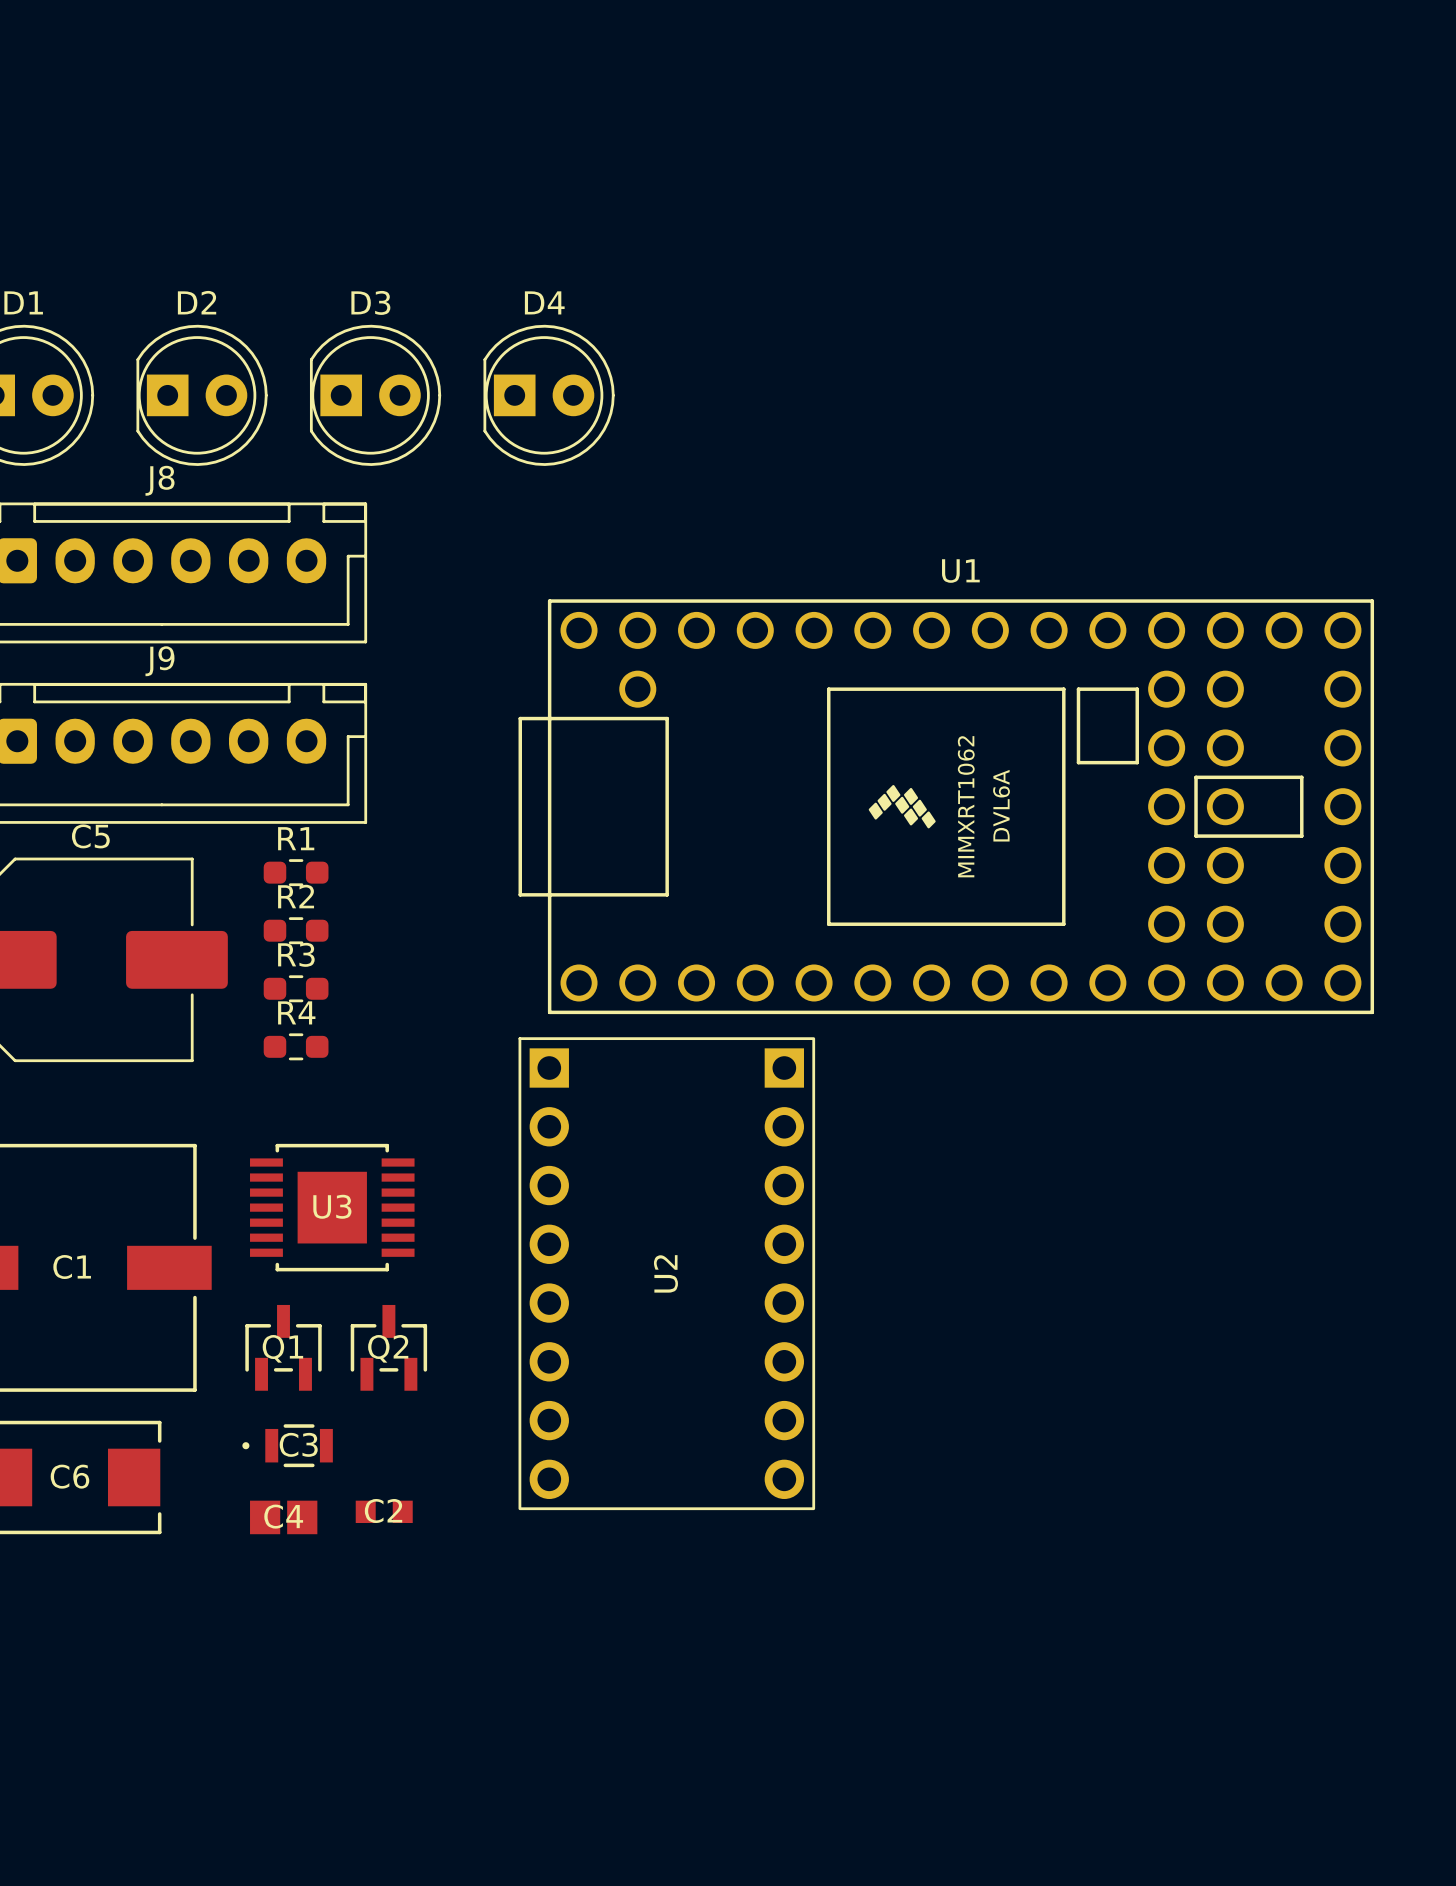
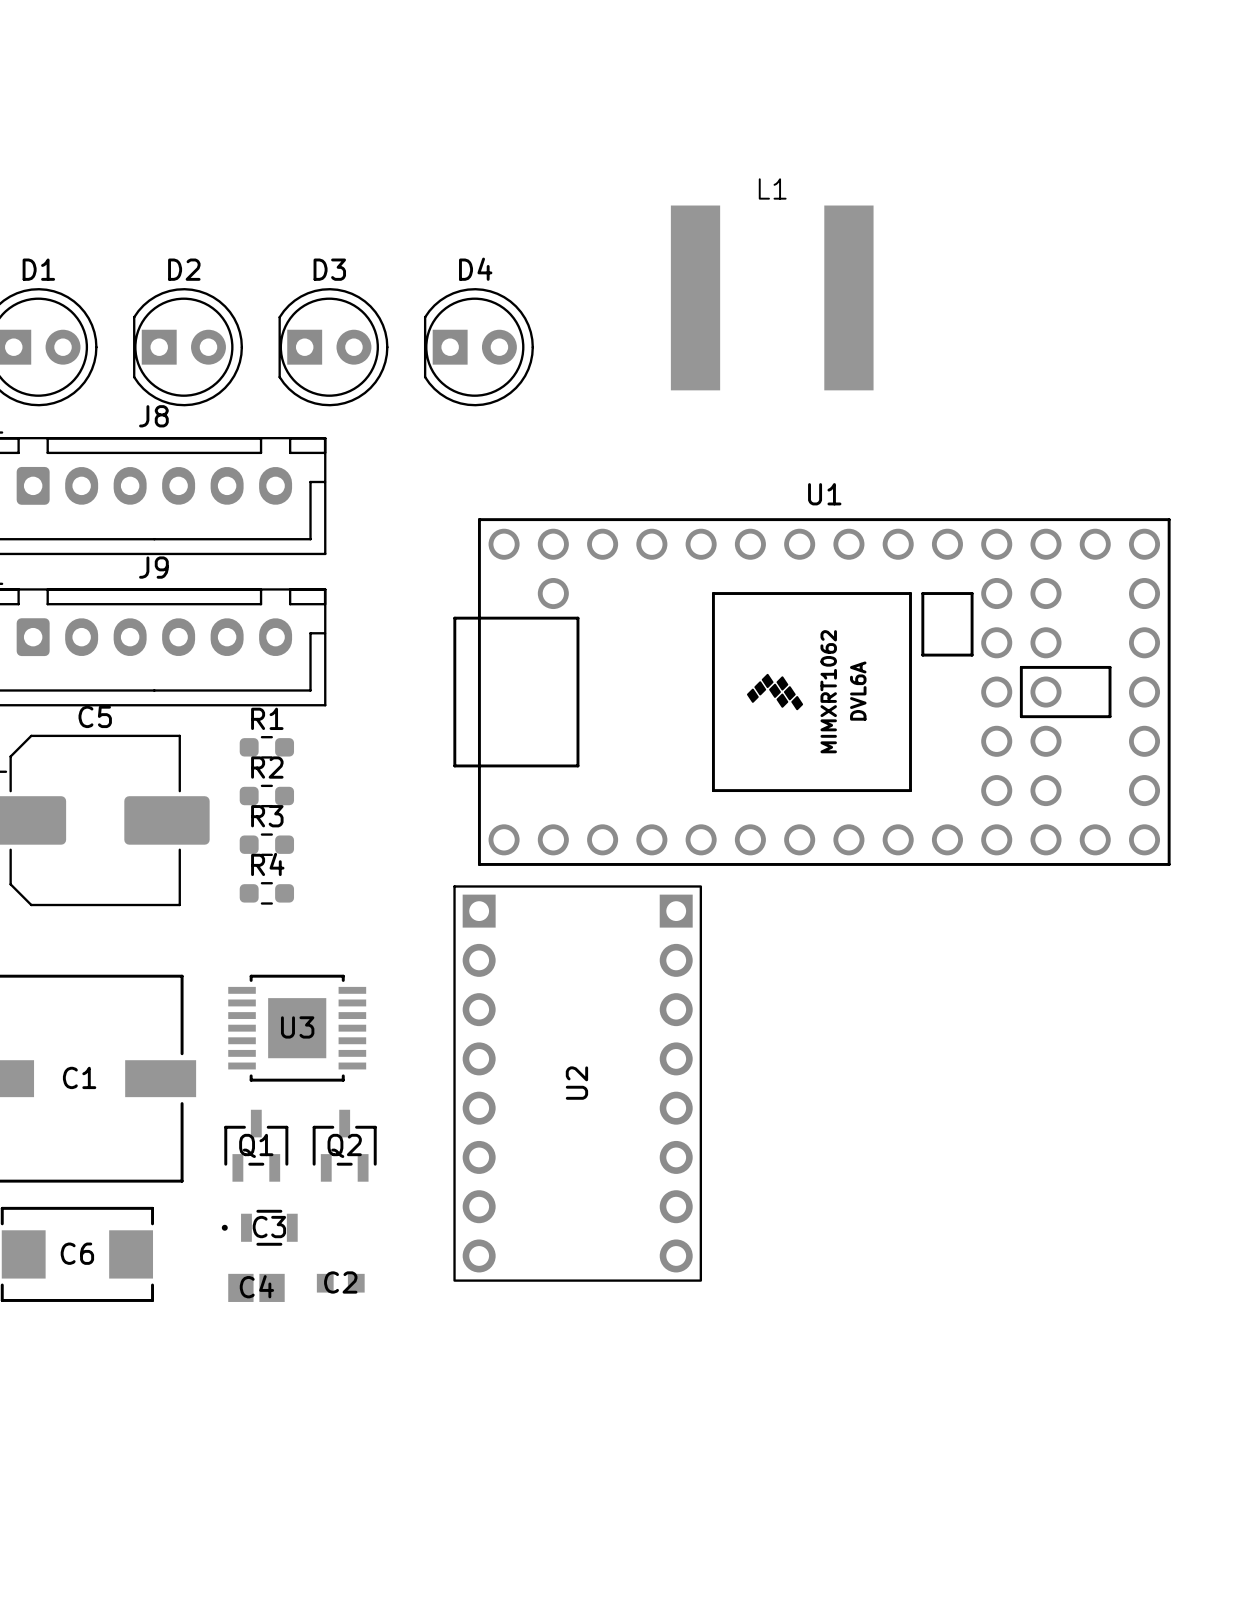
L1: none -> (772, 297)

